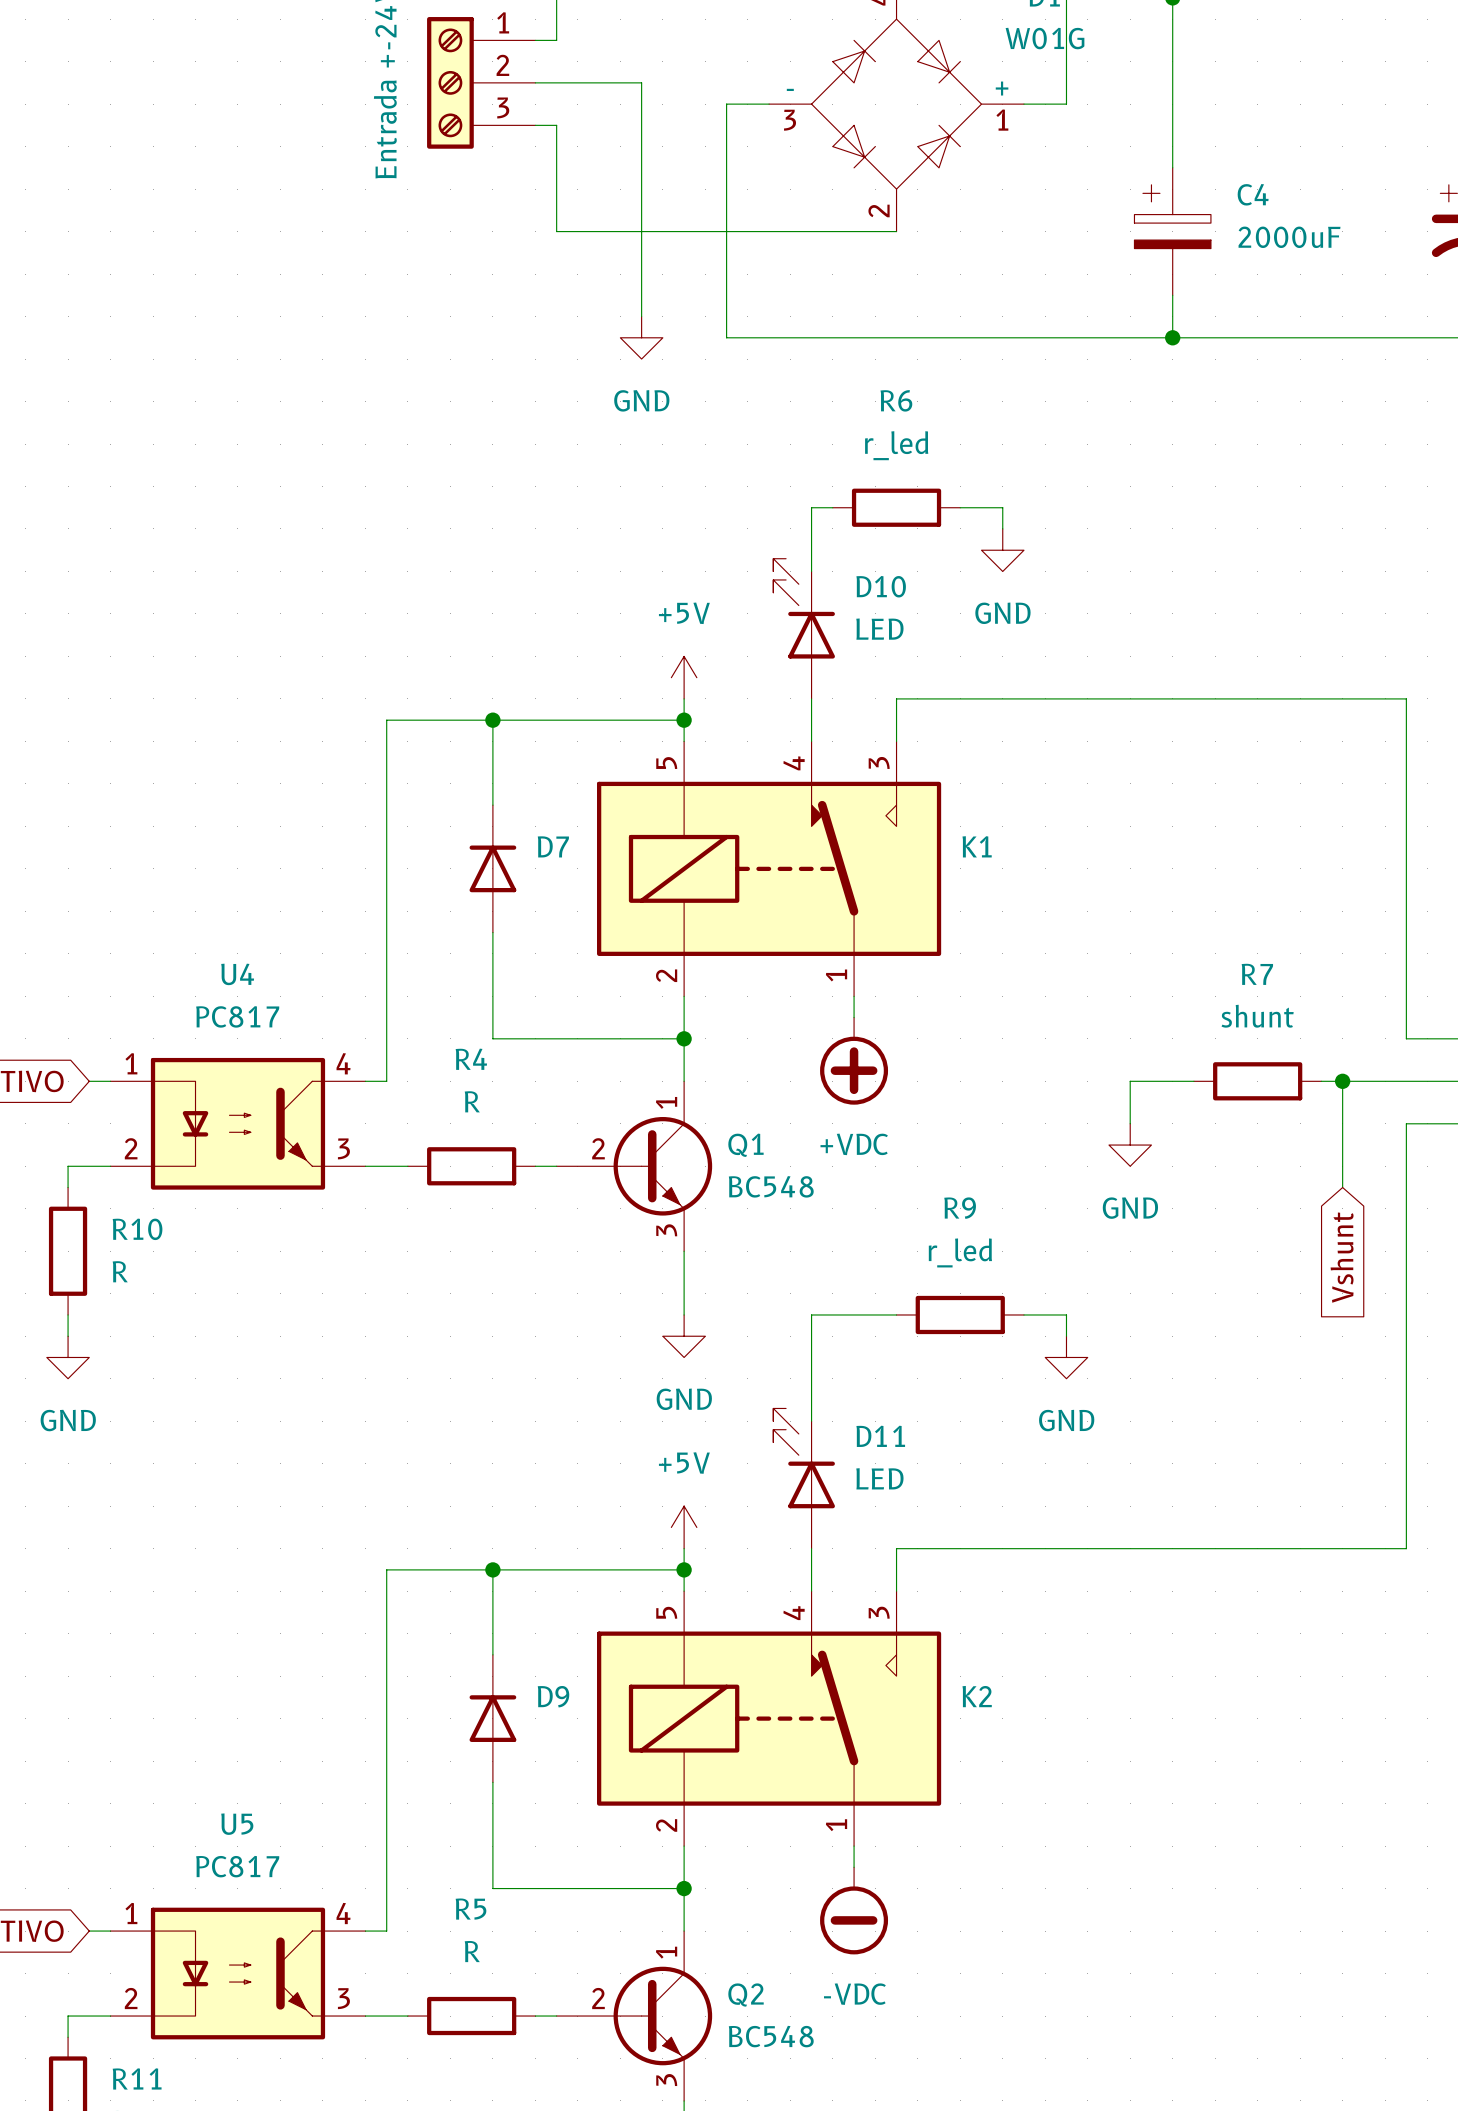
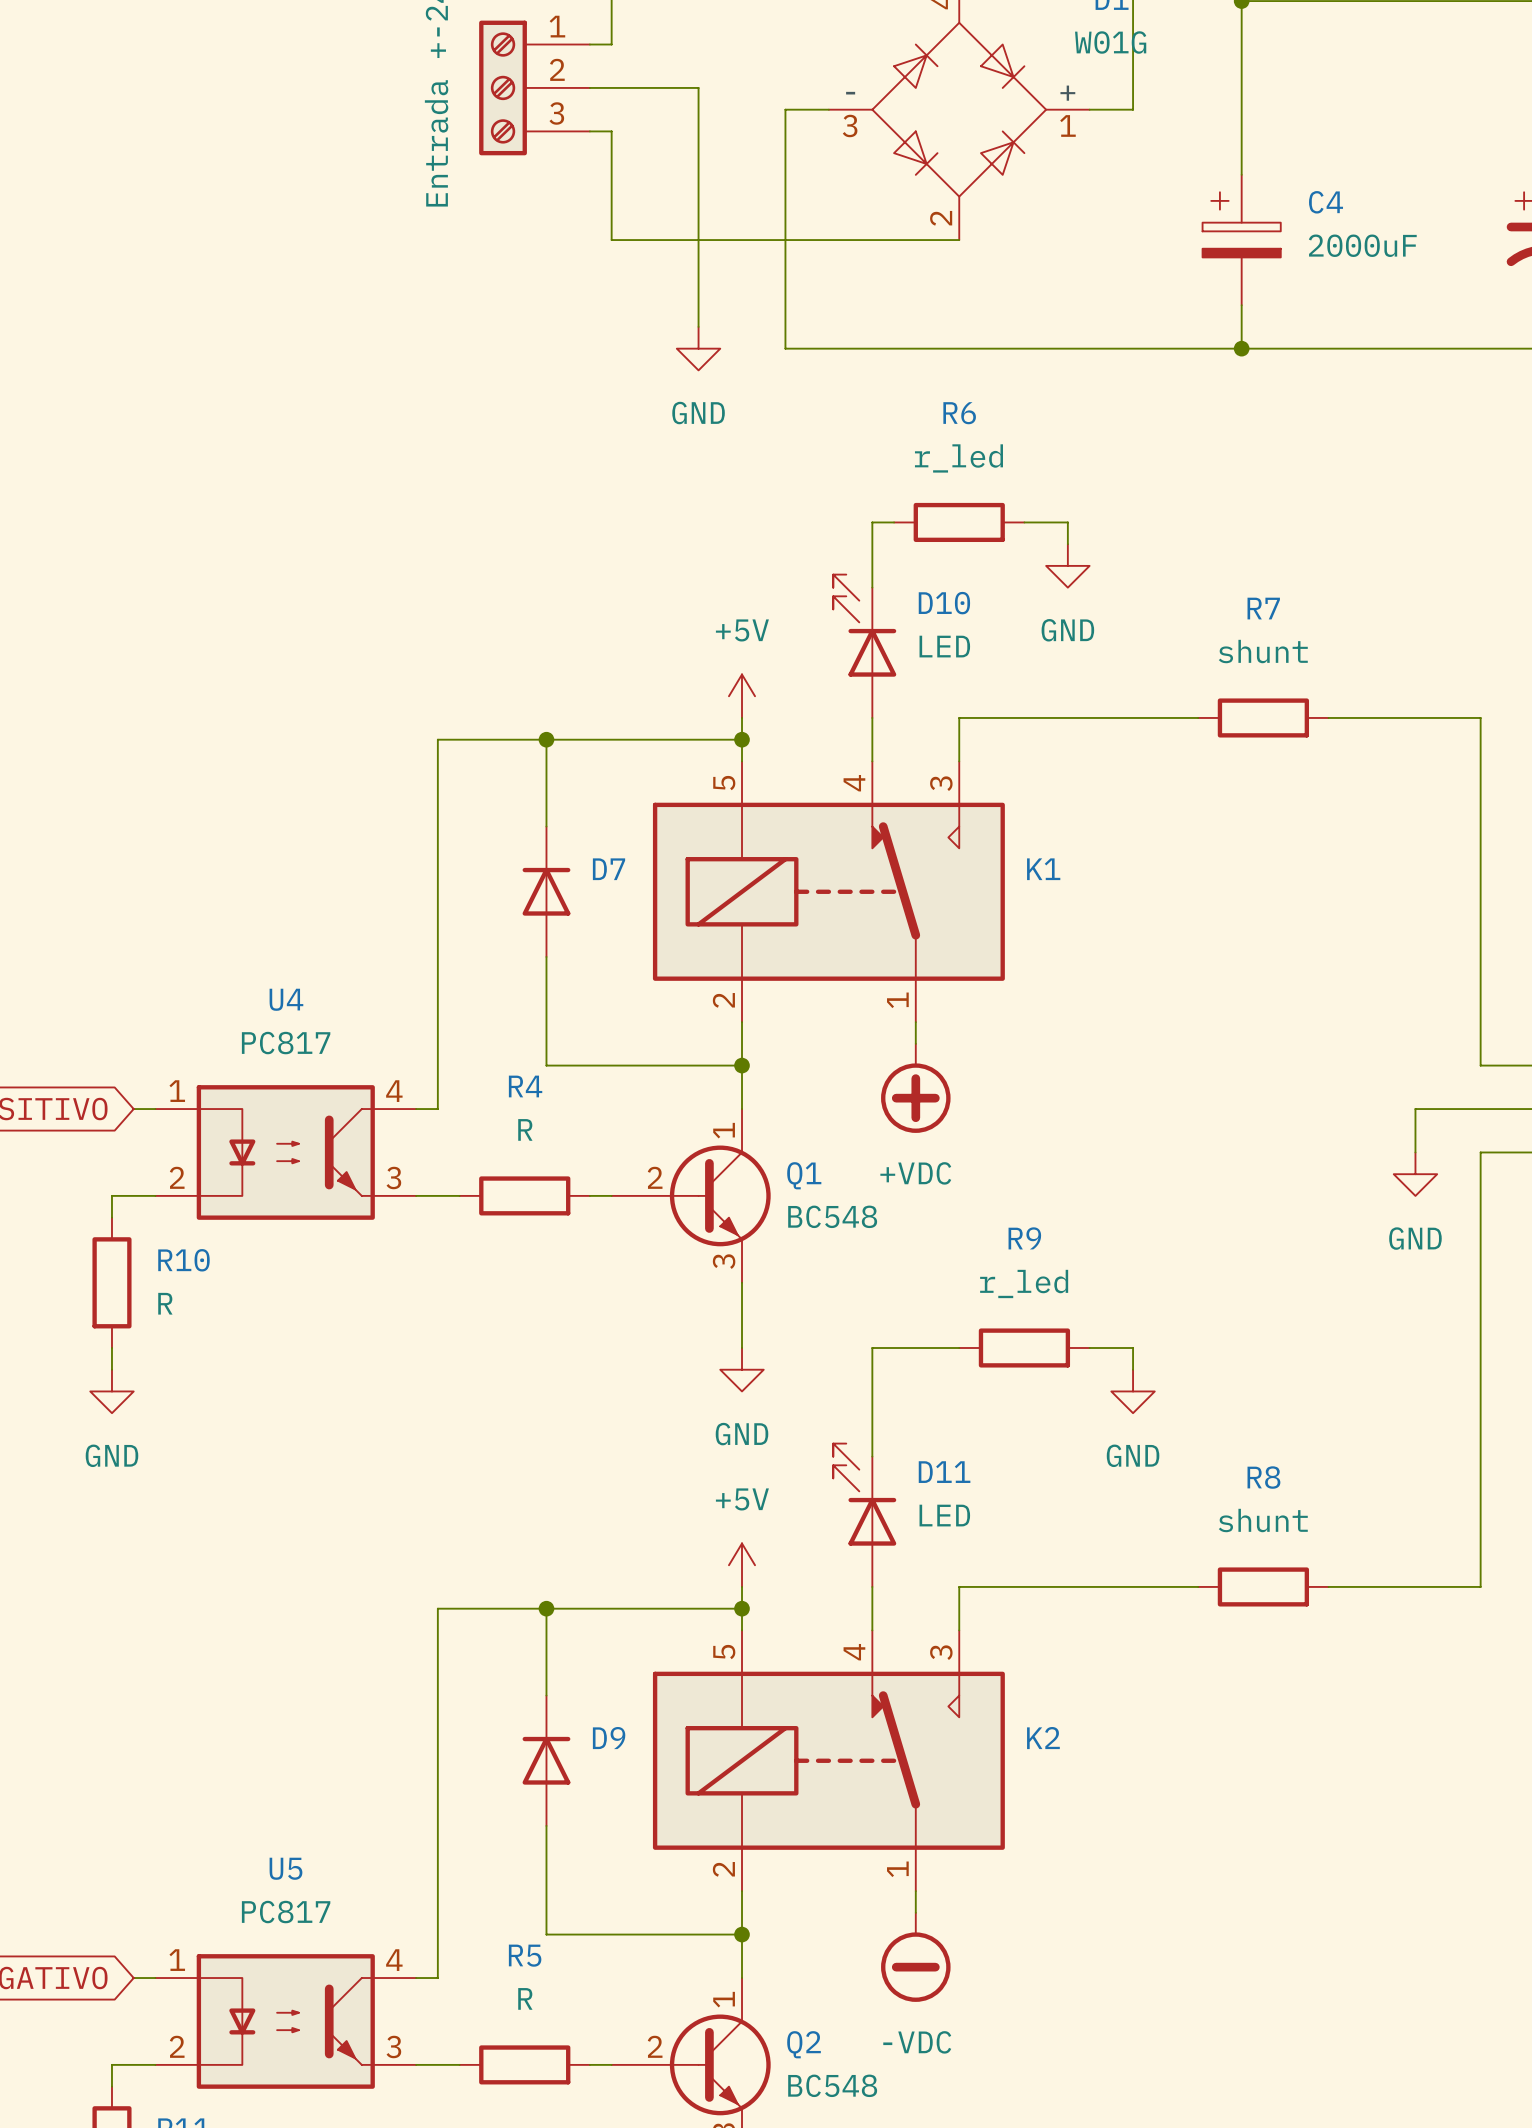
wire: (1130, 698) (1257, 698) -> none
wire: (1193, 1081) (1130, 1081) (1130, 1123) -> none
R7 position: (1257, 1081) -> (1263, 717)
wire: (1321, 1081) (1342, 1081) -> none
junction: (1342, 1081) -> none
wire: (1342, 1123) (1342, 1187) -> none
power symbol position: GND (1130, 1145) -> GND (1415, 1174)
global label: Vshunt (1342, 1257) -> none
wire: (1130, 1548) (1257, 1548) -> none
R8: none -> shunt (1263, 1586)

